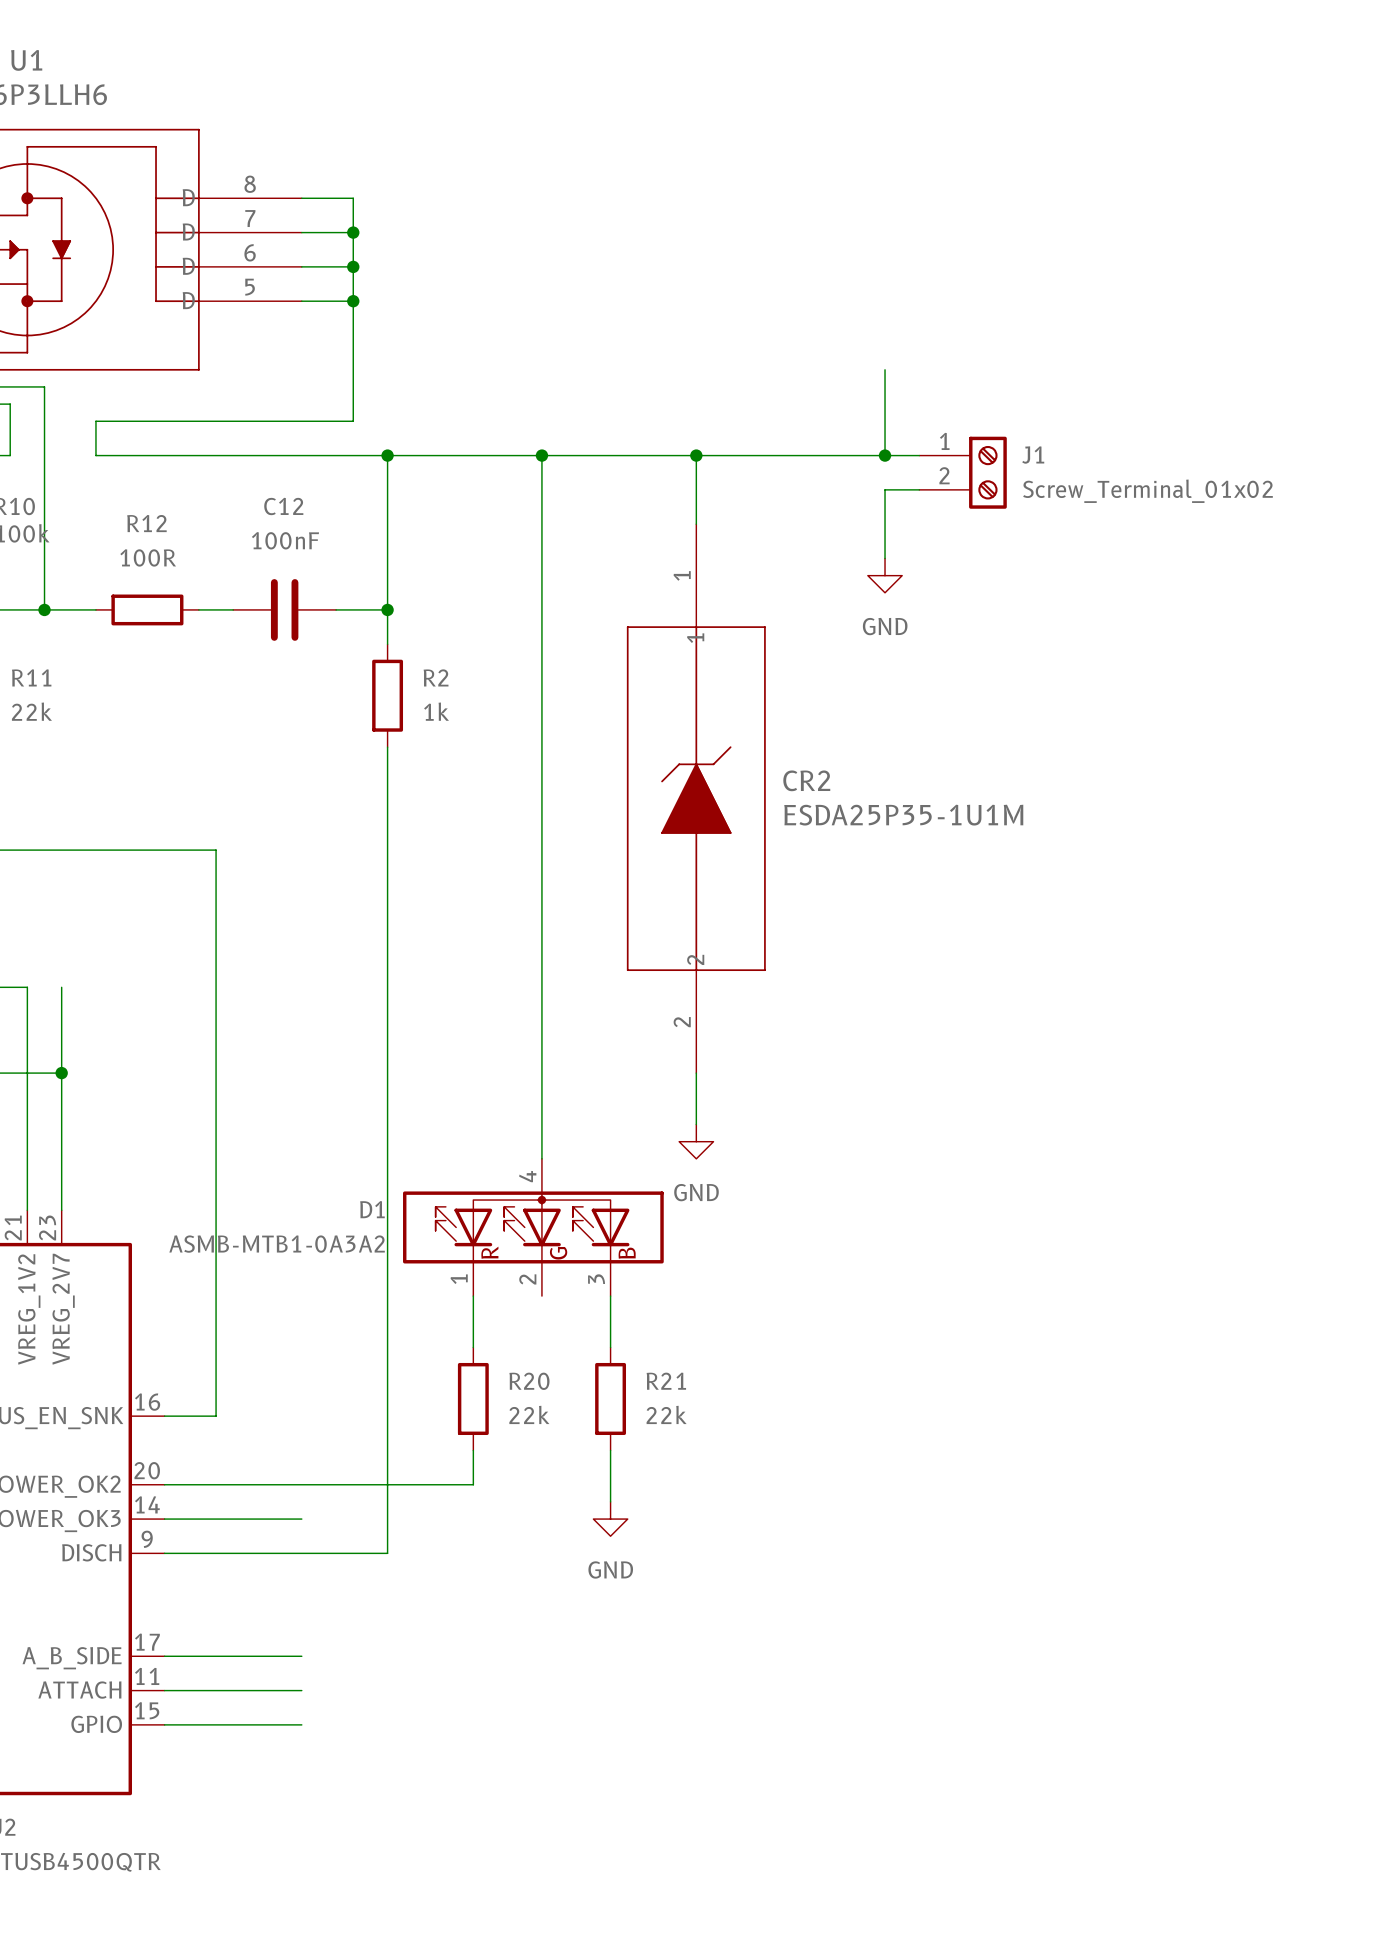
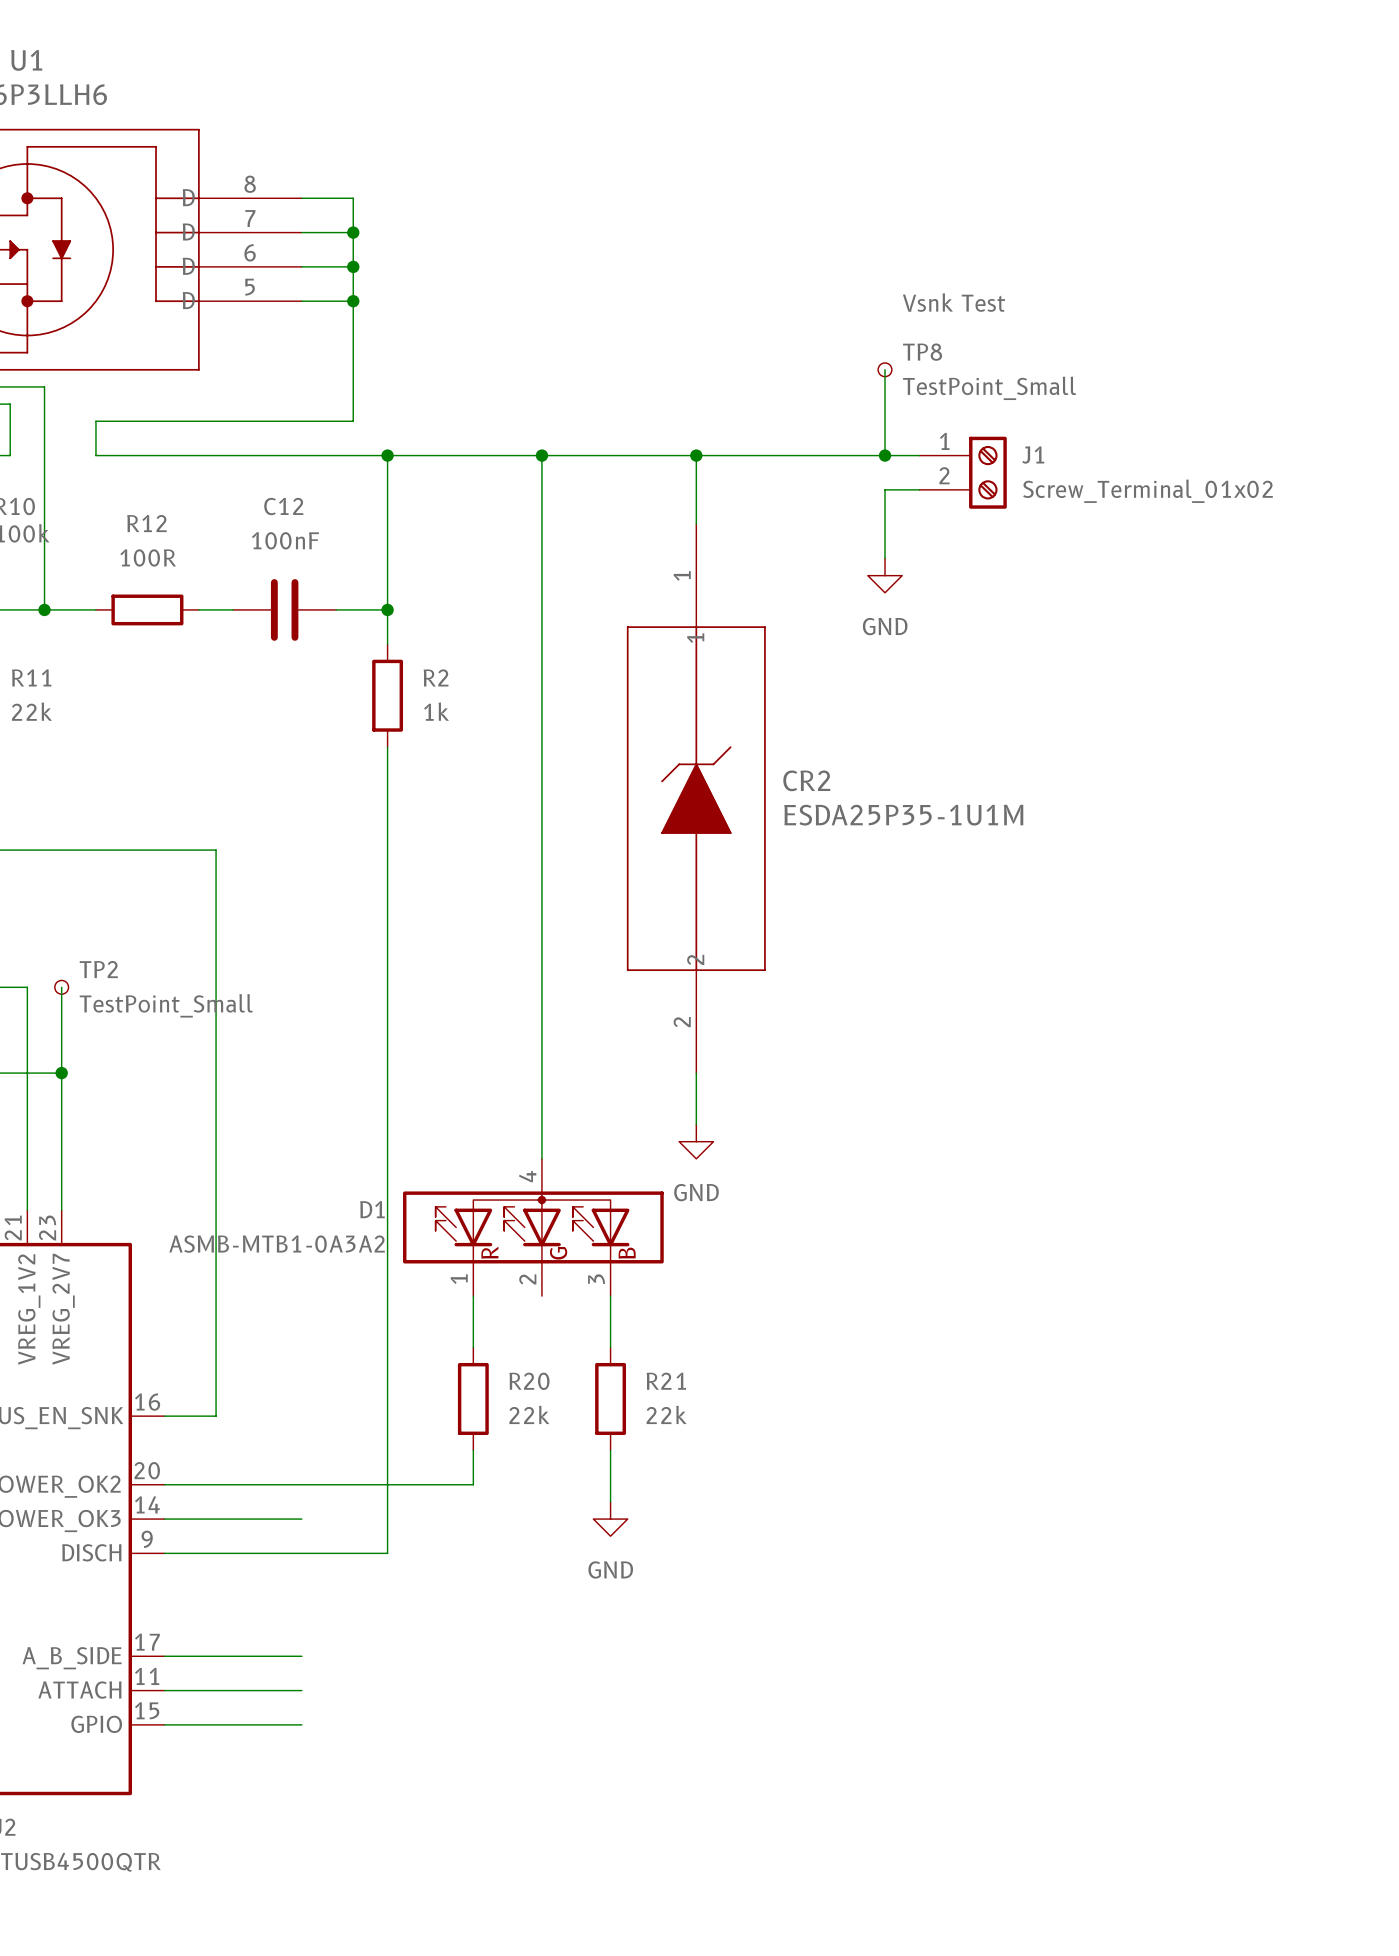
label: none -> Vsnk Test (954, 302)
TP8: none -> TestPoint_Small (885, 369)
TP2: none -> TestPoint_Small (61, 987)

